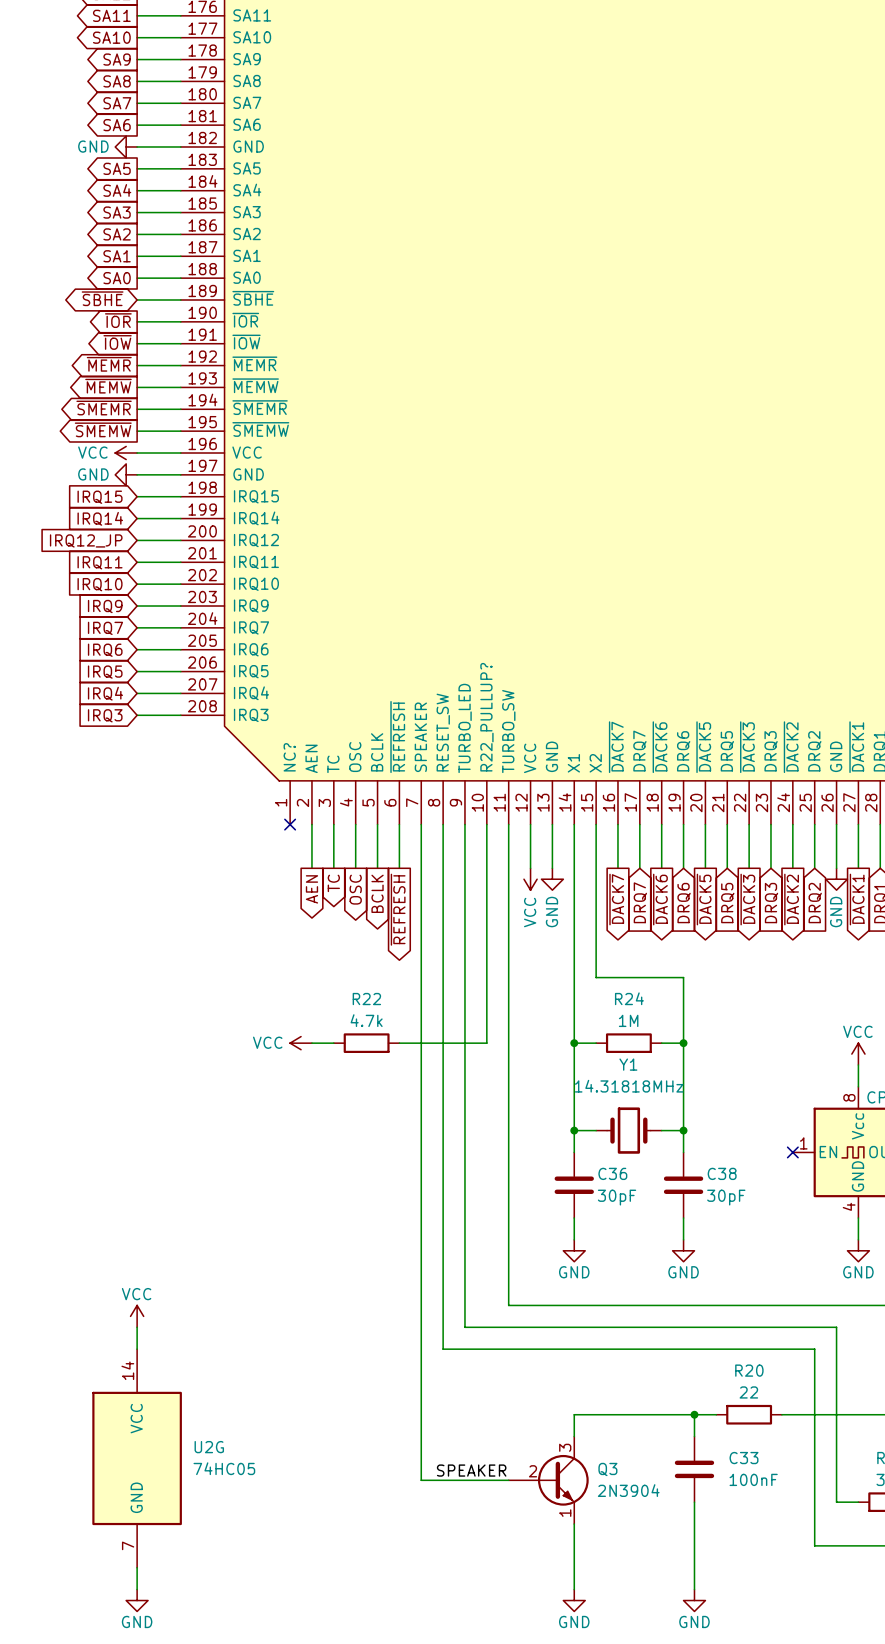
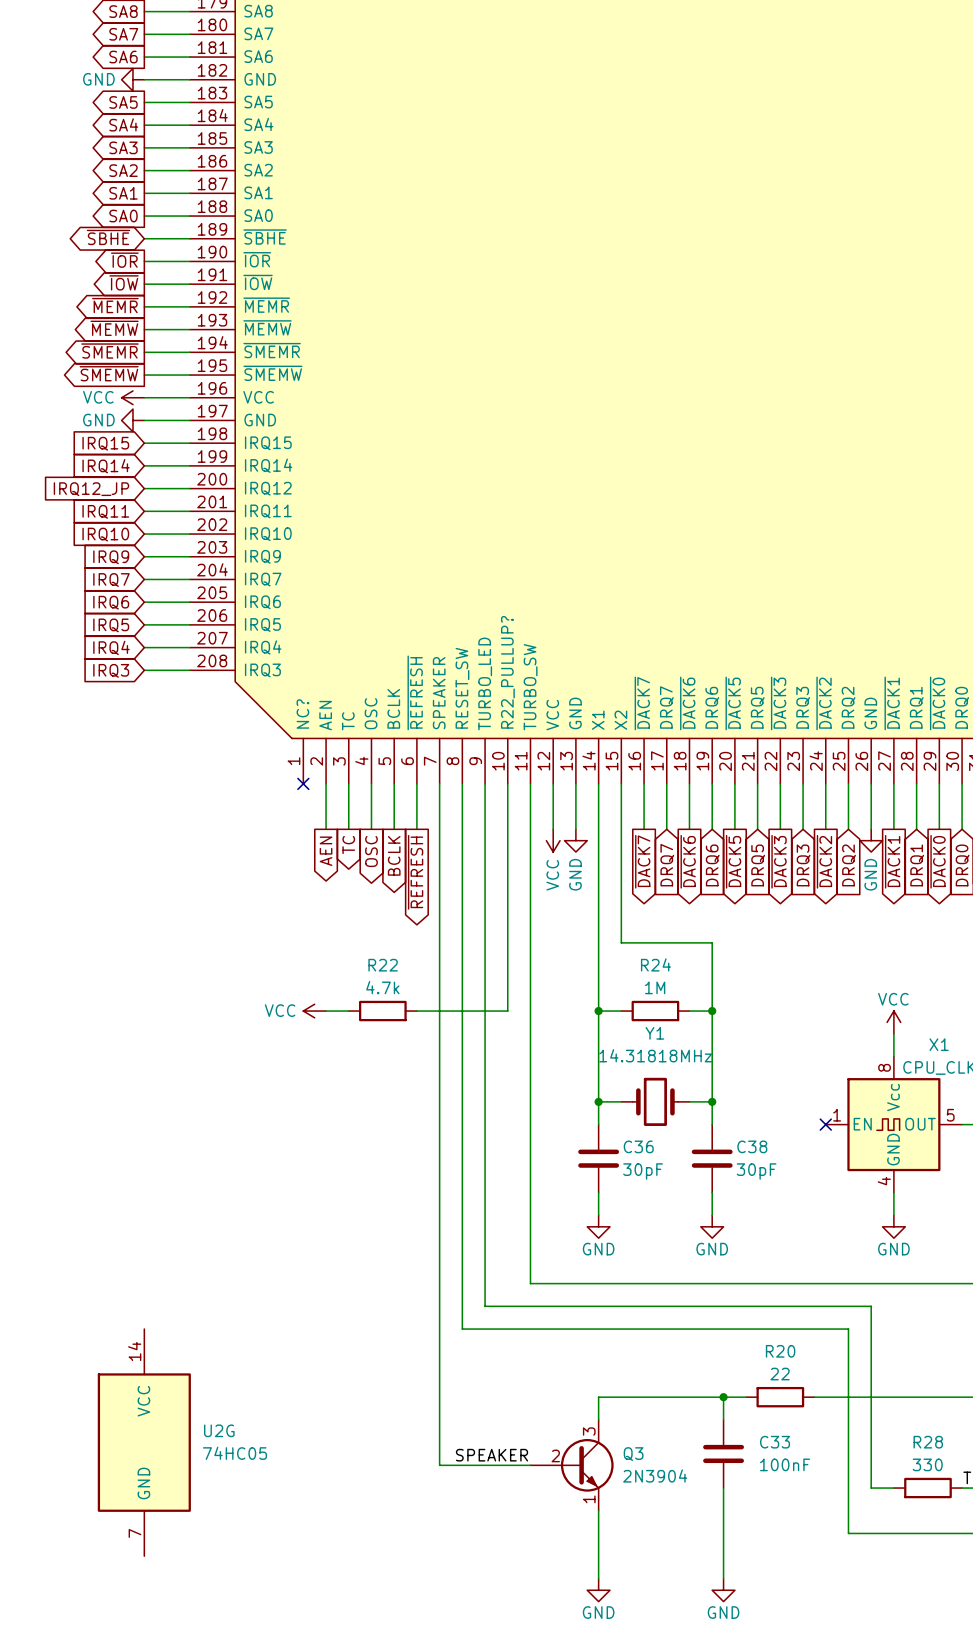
power symbol: VCC (137, 1316) -> none
wire: (137, 1327) (137, 1349) -> none
wire: (137, 1567) (137, 1589) -> none
power symbol: GND (137, 1600) -> none

